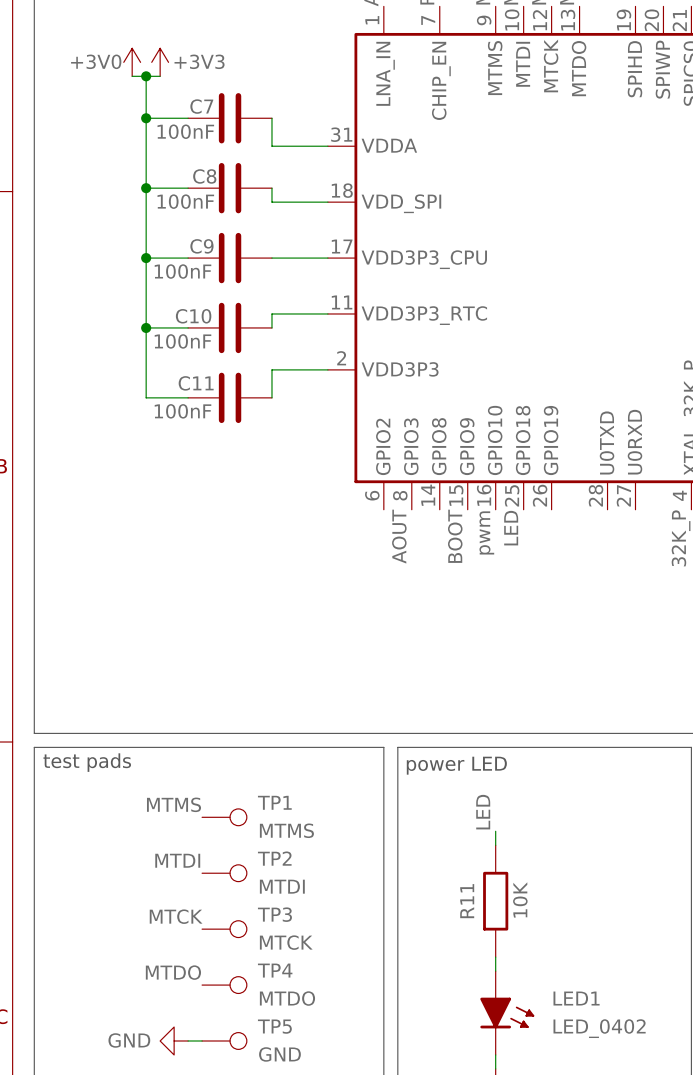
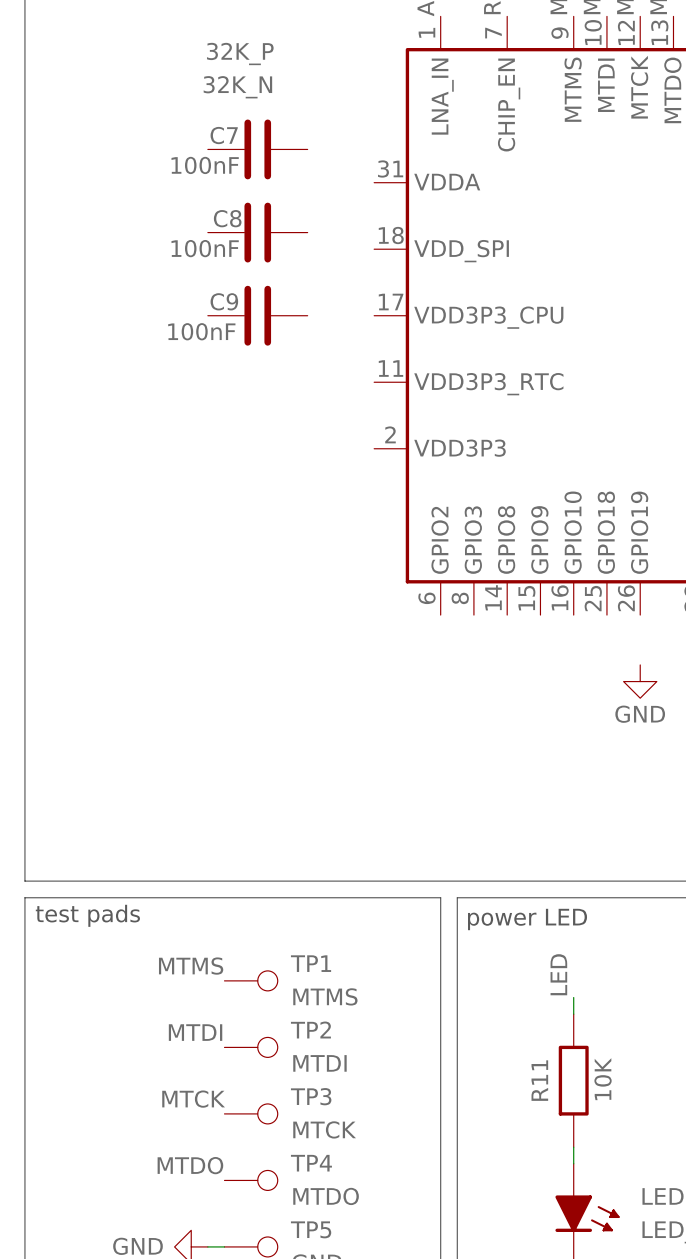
label: none -> 32K_P (240, 53)
power symbol: +3V0 (132, 62) -> none
power symbol: +3V3 (160, 62) -> none
label: none -> 32K_N (237, 87)
wire: (132, 76) (160, 76) -> none
wire: (146, 76) (146, 397) (188, 397) -> none
junction: (146, 76) -> none
wire: (146, 118) (188, 118) -> none
junction: (146, 118) -> none
wire: (271, 118) (271, 146) (327, 146) -> none
wire: (146, 188) (188, 188) -> none
junction: (146, 188) -> none
wire: (271, 188) (271, 202) (327, 202) -> none
wire: (146, 258) (188, 258) -> none
junction: (146, 258) -> none
wire: (271, 258) (327, 258) -> none
wire: (327, 313) (271, 313) (271, 327) -> none
wire: (146, 327) (188, 327) -> none
junction: (146, 327) -> none
C10: 100nF (230, 327) -> none
wire: (327, 369) (271, 369) (271, 397) -> none
C11: 100nF (230, 397) -> none
label: LED (511, 528) -> none
label: pwm (486, 532) -> none
label: AOUT (399, 536) -> none
label: BOOT (455, 536) -> none
power symbol: none -> GND (640, 681)

